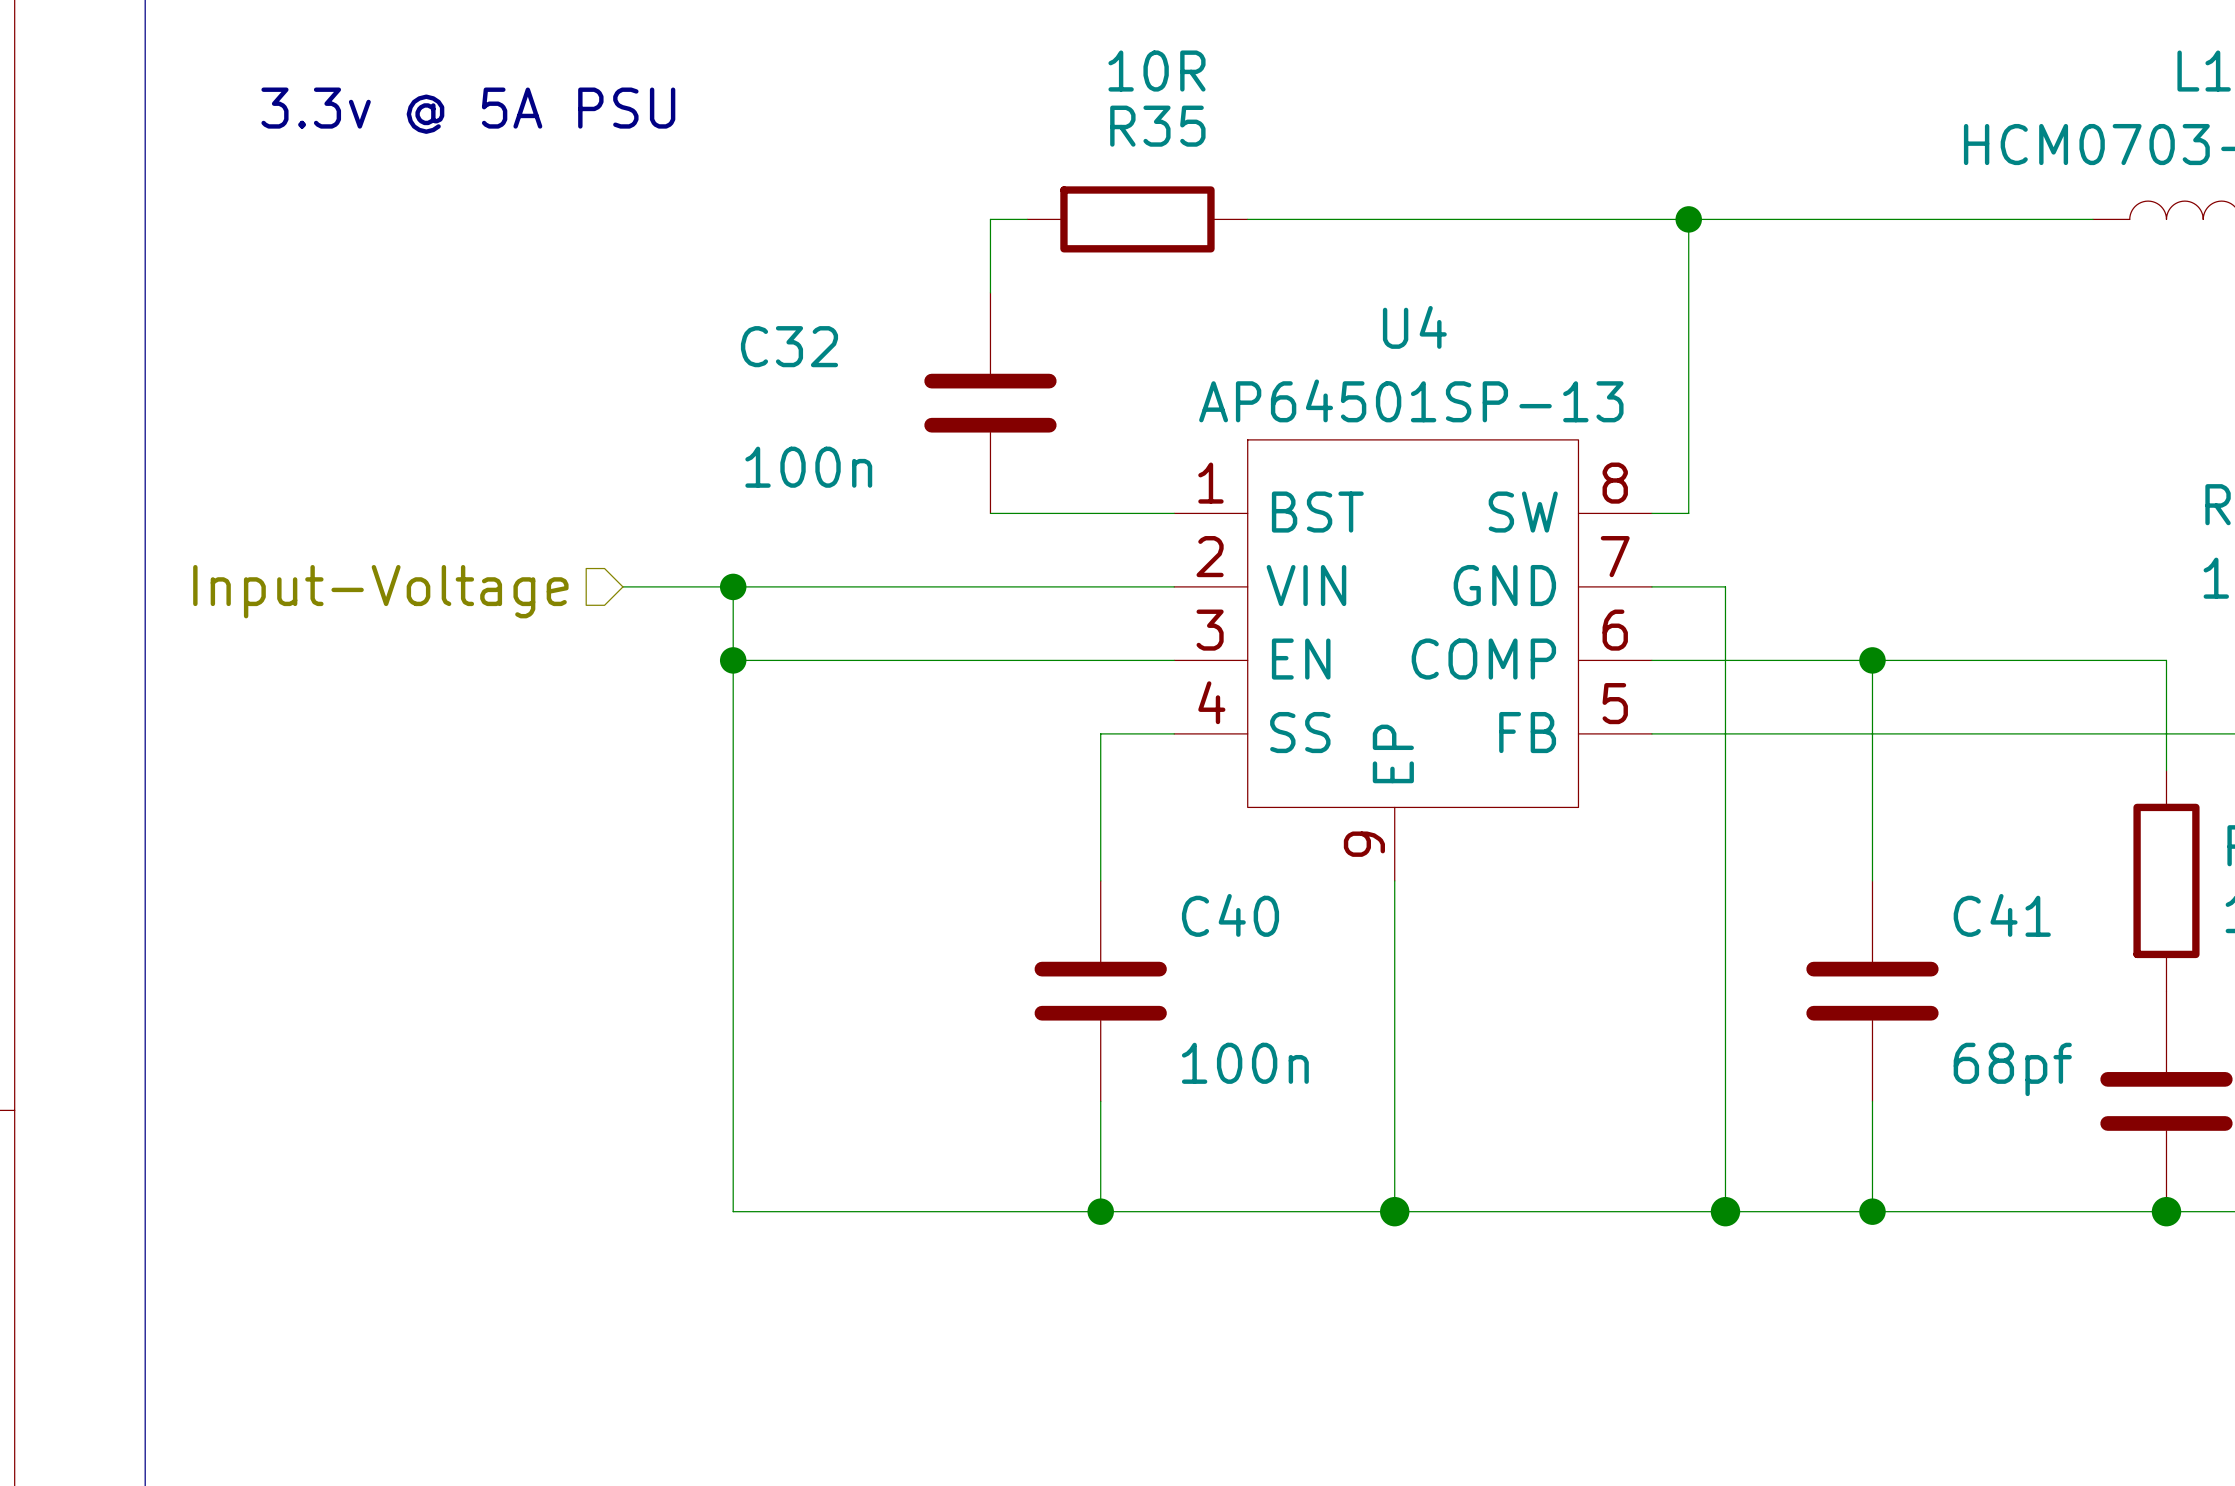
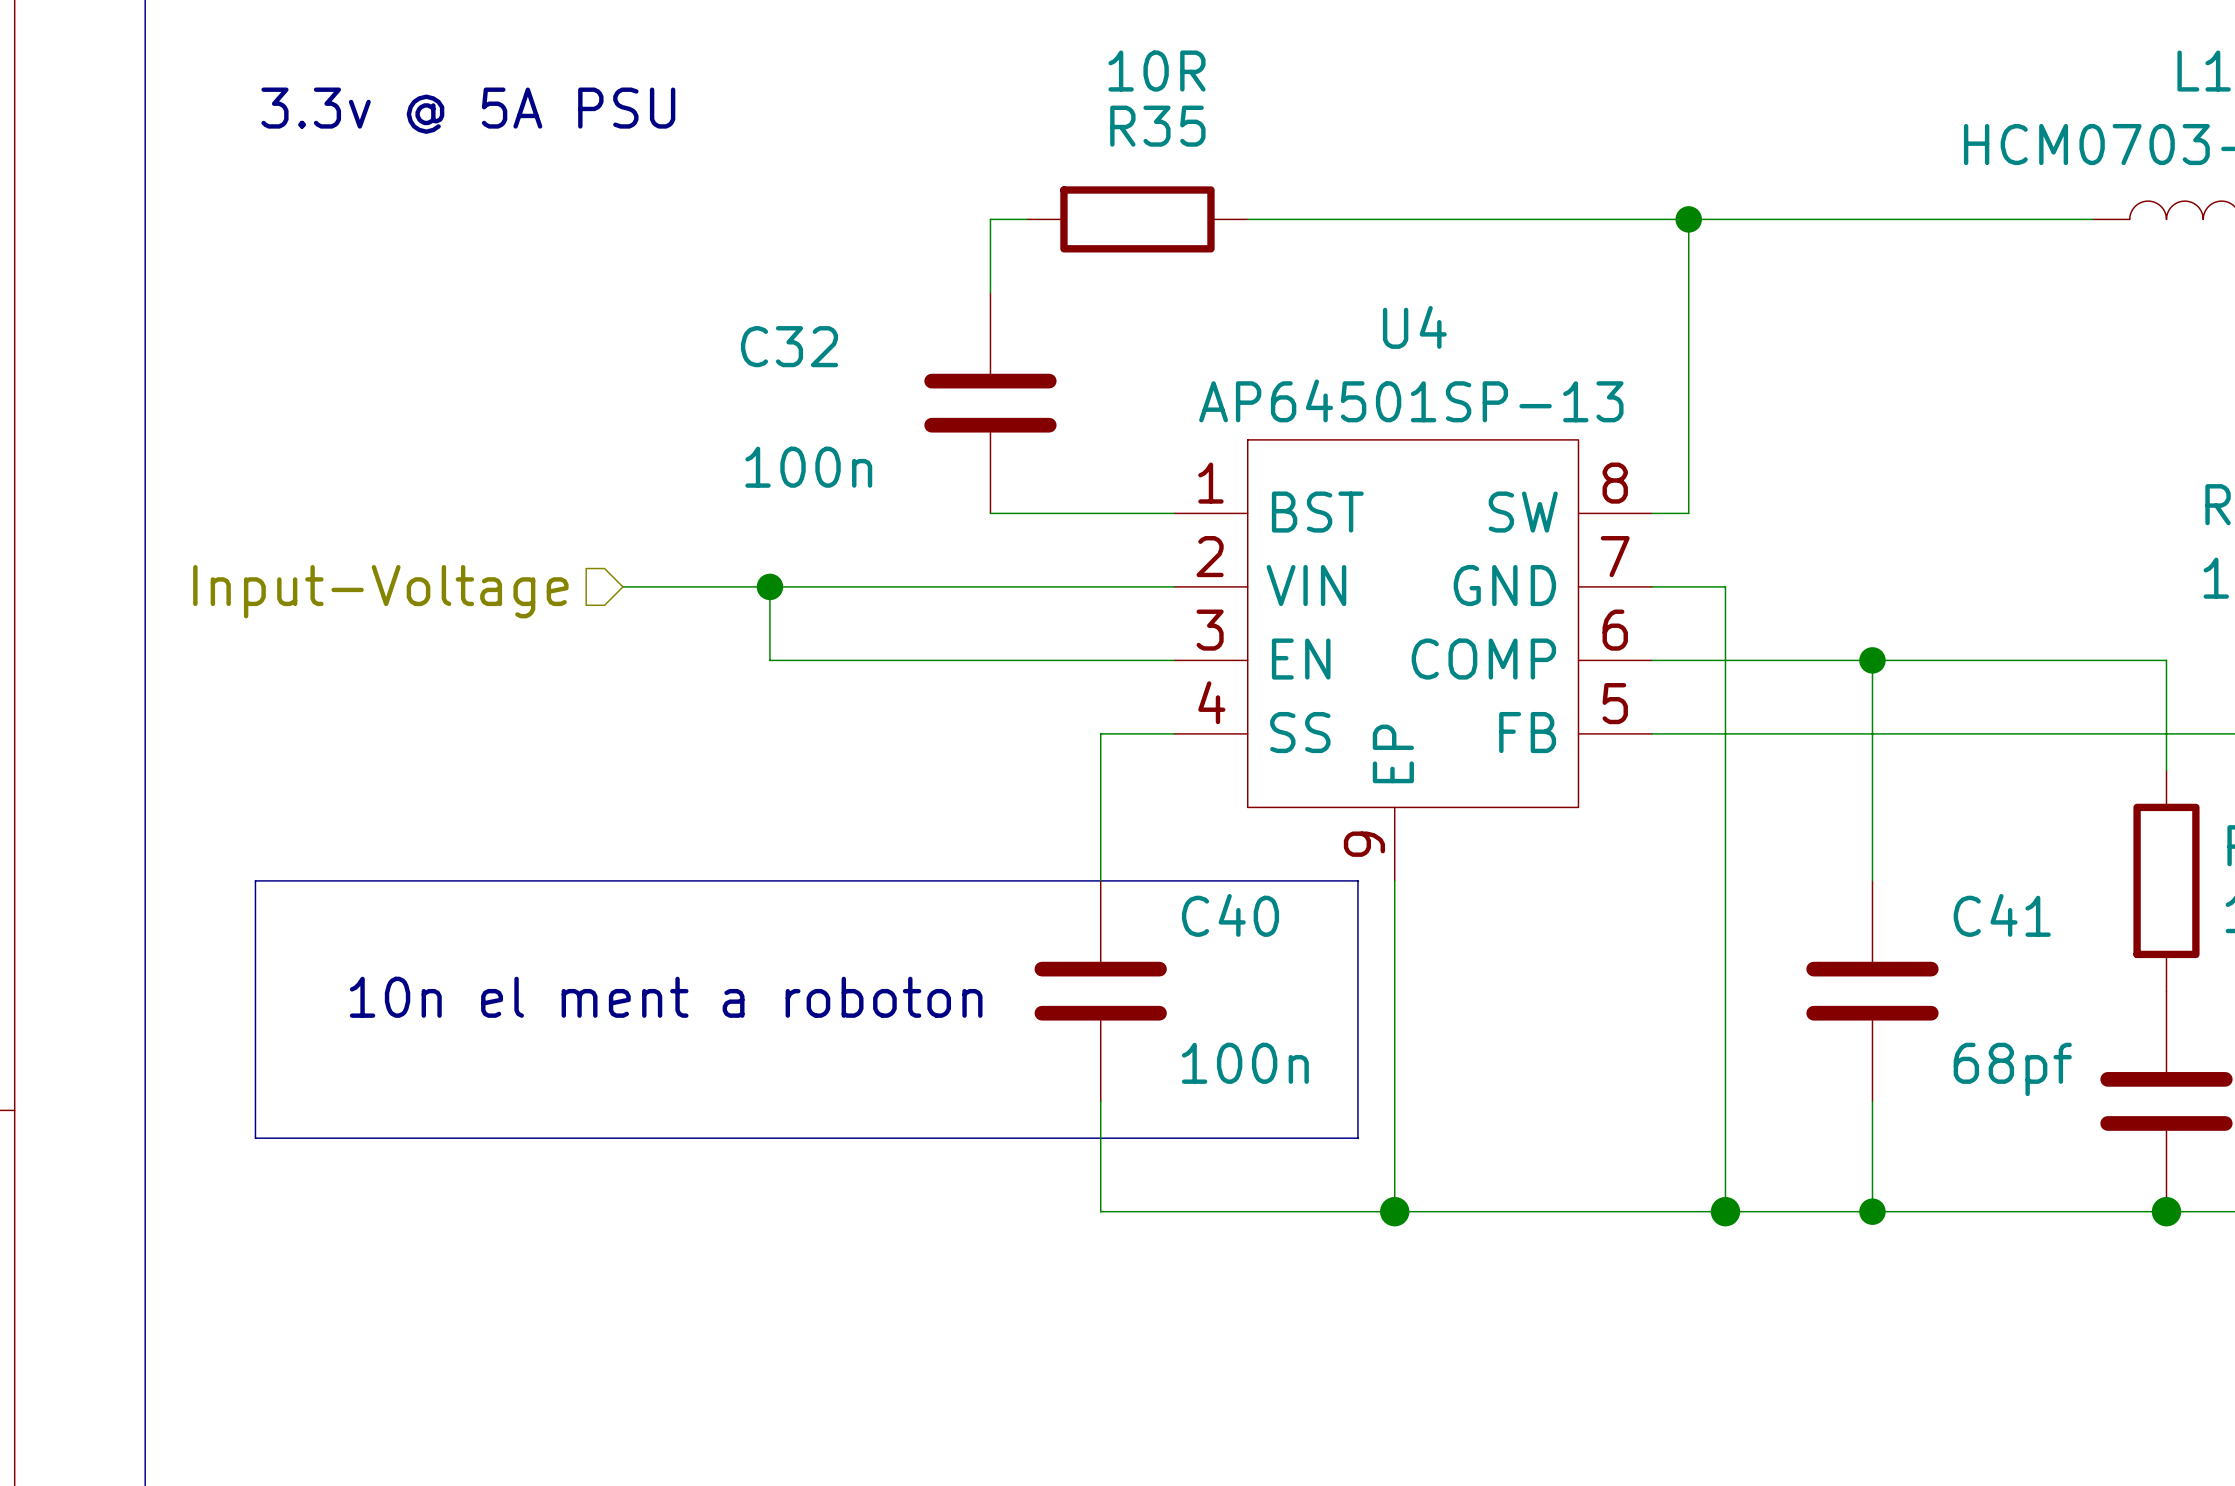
wire: (733, 586) (733, 1211) (1100, 1211) -> none
junction position: (733, 586) -> (769, 586)
wire: (733, 660) (769, 660) -> (769, 586) (769, 660)
junction: (733, 660) -> none
line: none -> (255, 880) (1357, 880) (1357, 1138) (255, 1138) (255, 880)
text: none -> 10n el ment a roboton (666, 997)
junction: (1100, 1211) -> none

